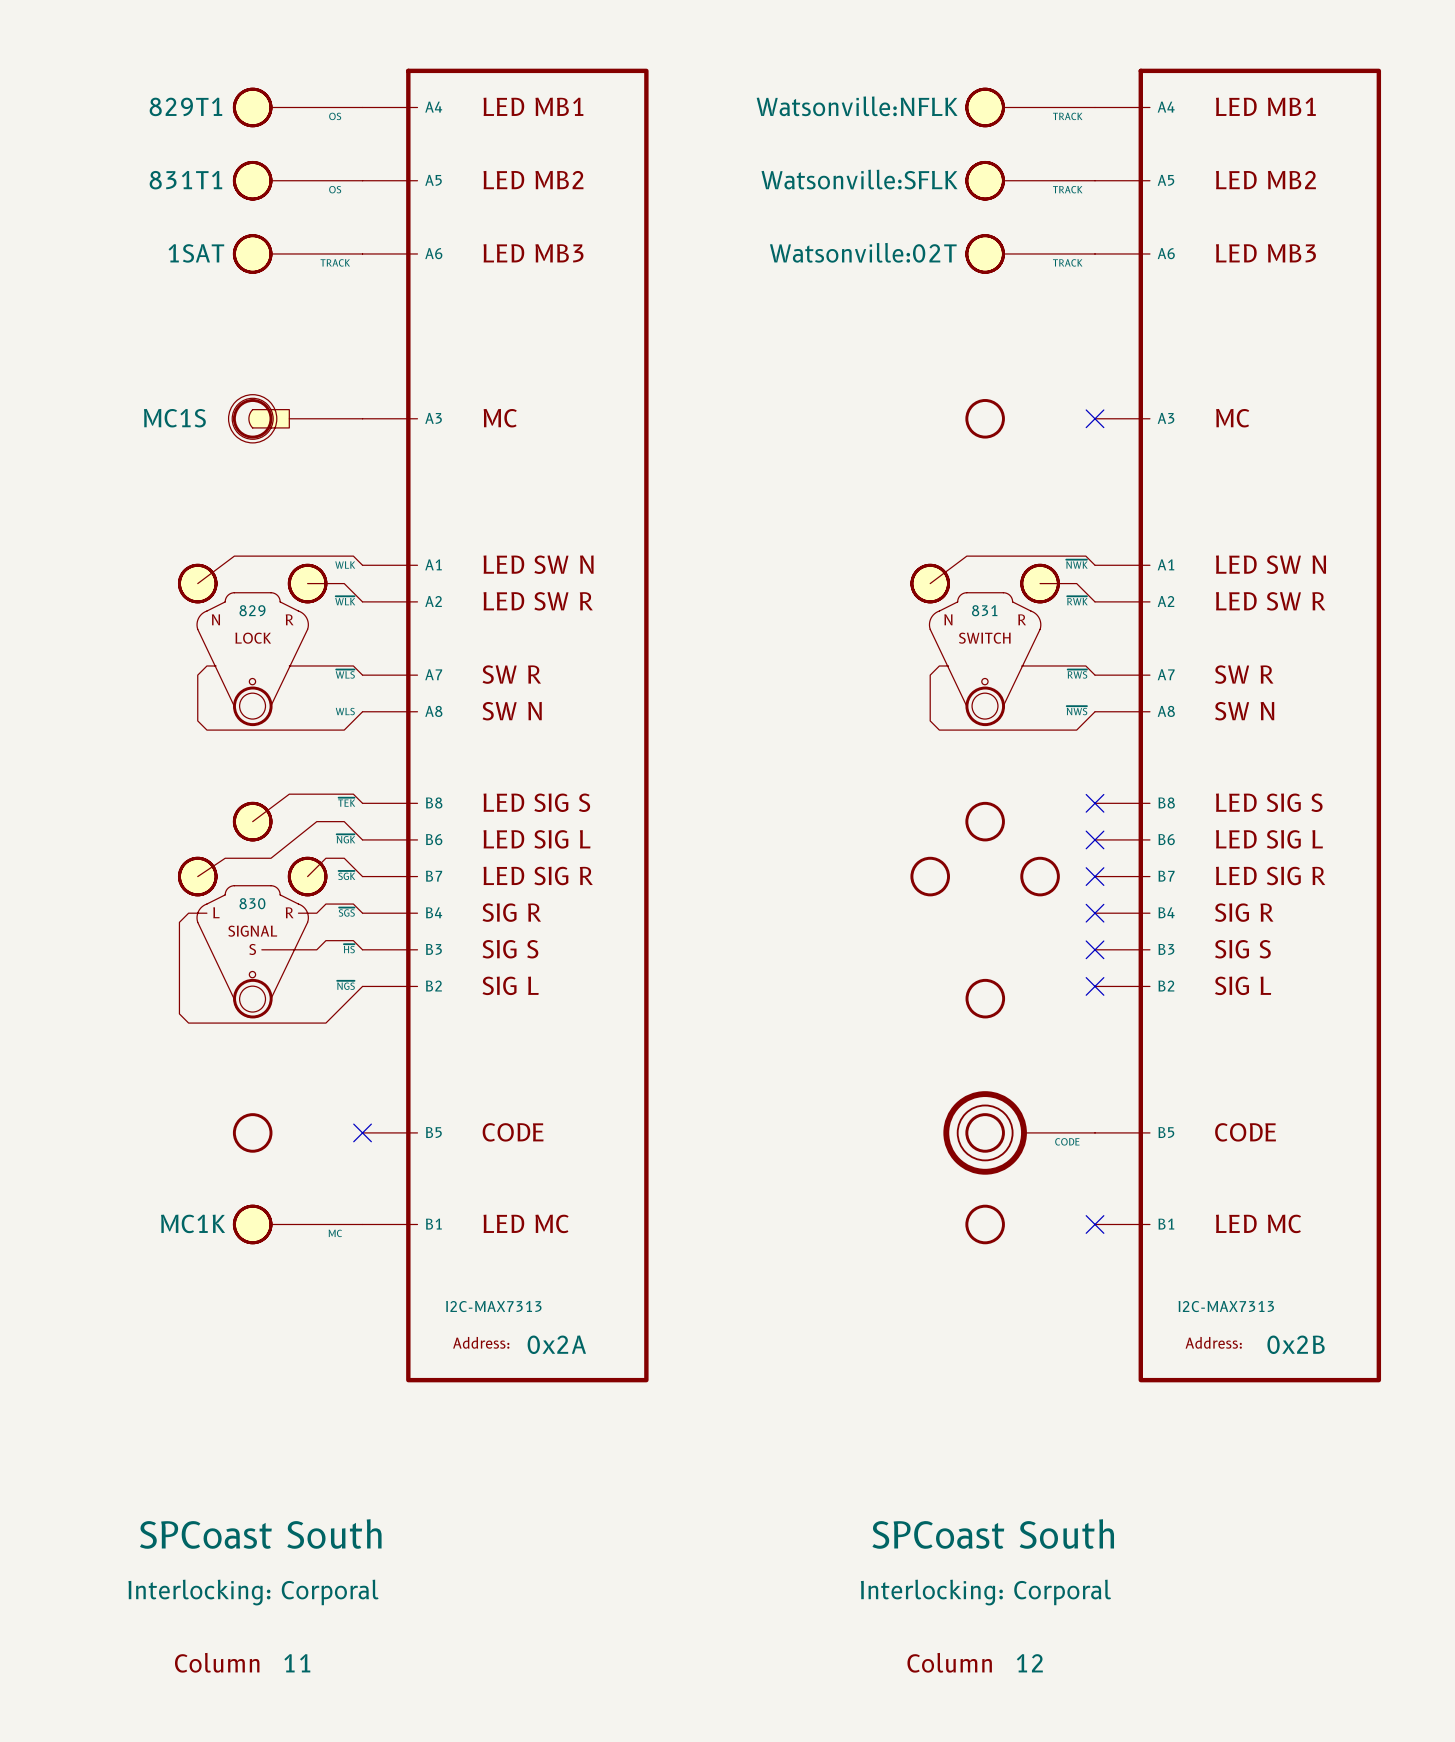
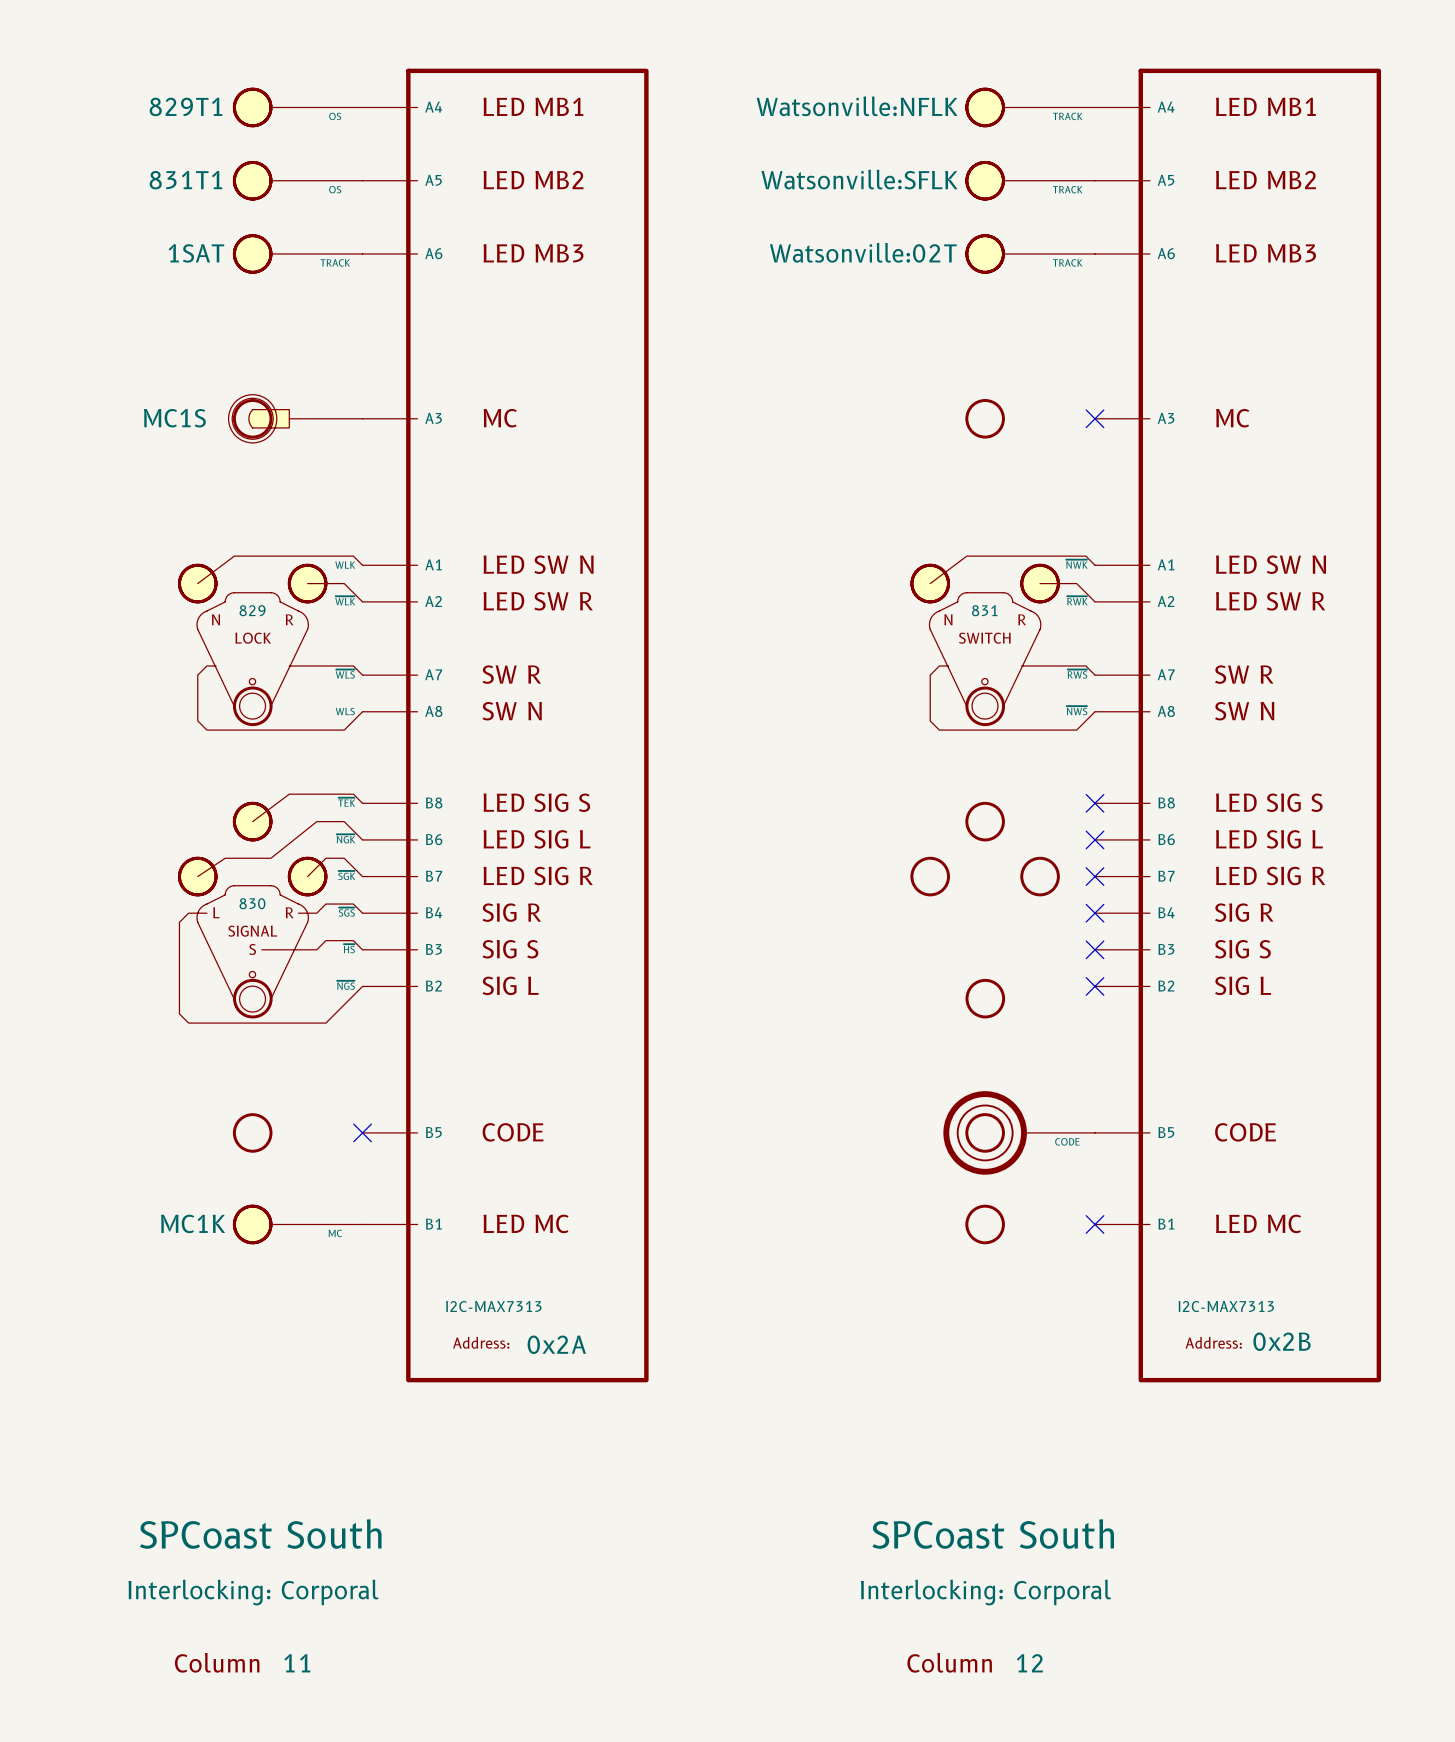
part text position: 0x2B (1296, 1344) -> 0x2B (1282, 1341)

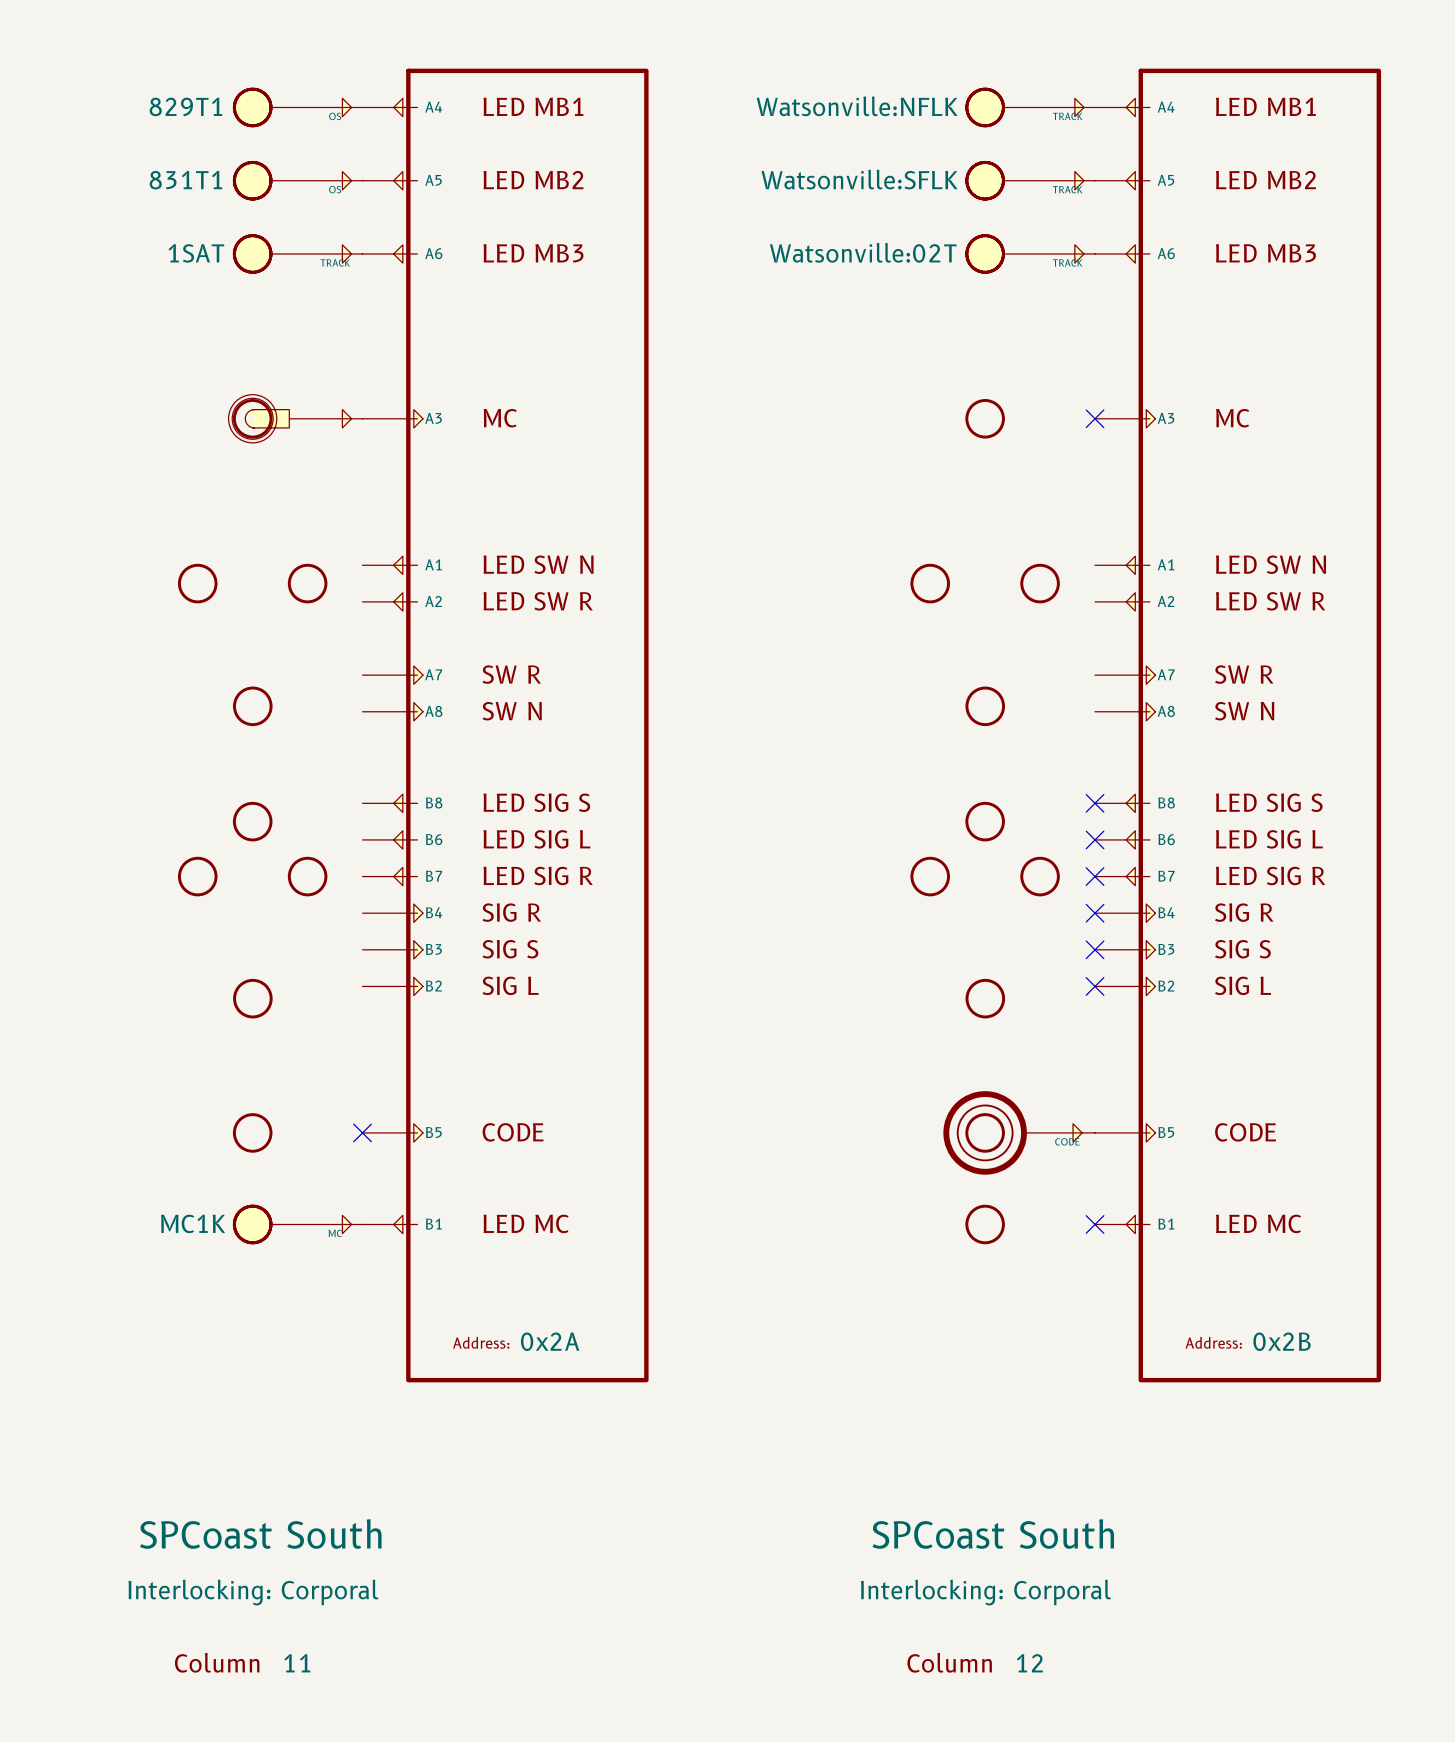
part symbol: [362, 68, 649, 1383] -> [362, 68, 649, 1383]
part symbol: [1095, 68, 1382, 1383] -> [1095, 68, 1382, 1383]
part symbol: [232, 87, 363, 128] -> [232, 87, 363, 128]
part symbol: [965, 87, 1096, 128] -> [965, 87, 1096, 128]
part symbol: [232, 160, 363, 201] -> [232, 160, 363, 201]
part symbol: [965, 160, 1096, 201] -> [965, 160, 1096, 201]
part symbol: [232, 234, 363, 274] -> [232, 234, 363, 274]
part symbol: [965, 234, 1096, 274] -> [965, 234, 1096, 274]
part symbol: [228, 394, 363, 443] -> [228, 394, 363, 443]
part text: MC1S (174, 418) -> none
part: 829 (270, 643) -> none
part: 831 (1002, 643) -> none
part: 830 (270, 908) -> none
part symbol: [943, 1091, 1096, 1175] -> [943, 1091, 1096, 1175]
part symbol: [232, 1204, 363, 1245] -> [232, 1204, 363, 1245]
part text: I2C-MAX7313 (493, 1306) -> none
part text: I2C-MAX7313 (1226, 1306) -> none

